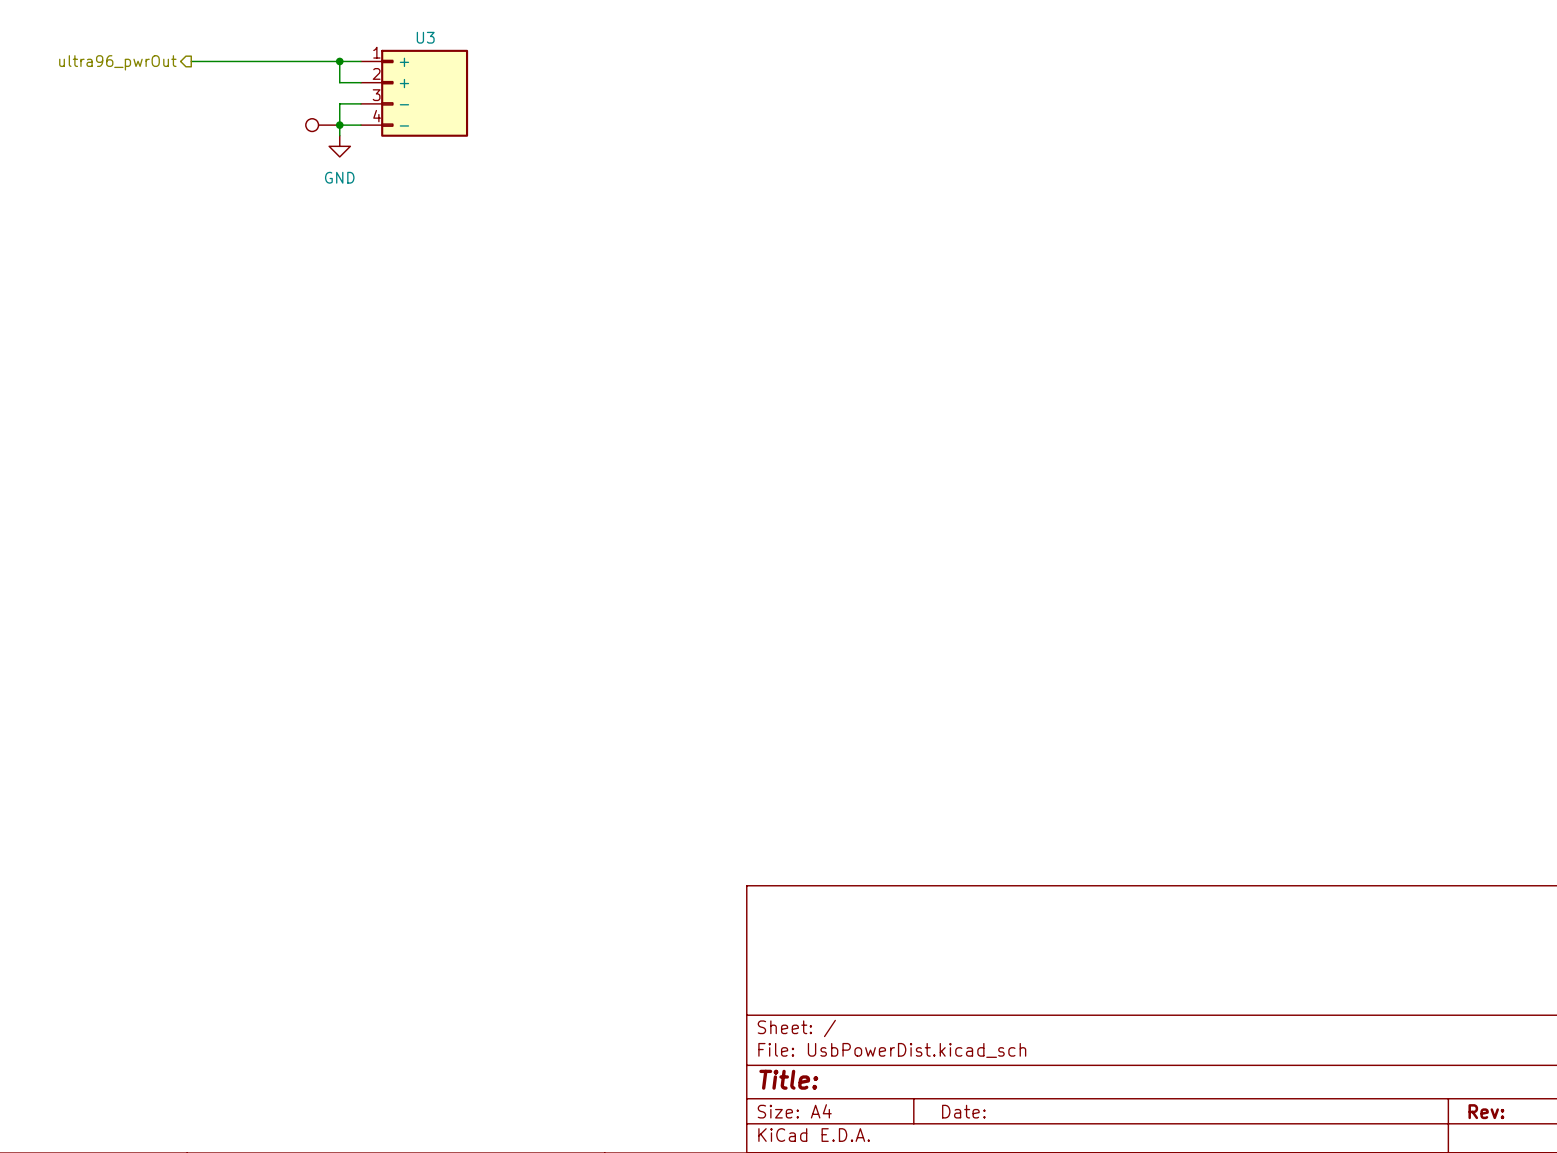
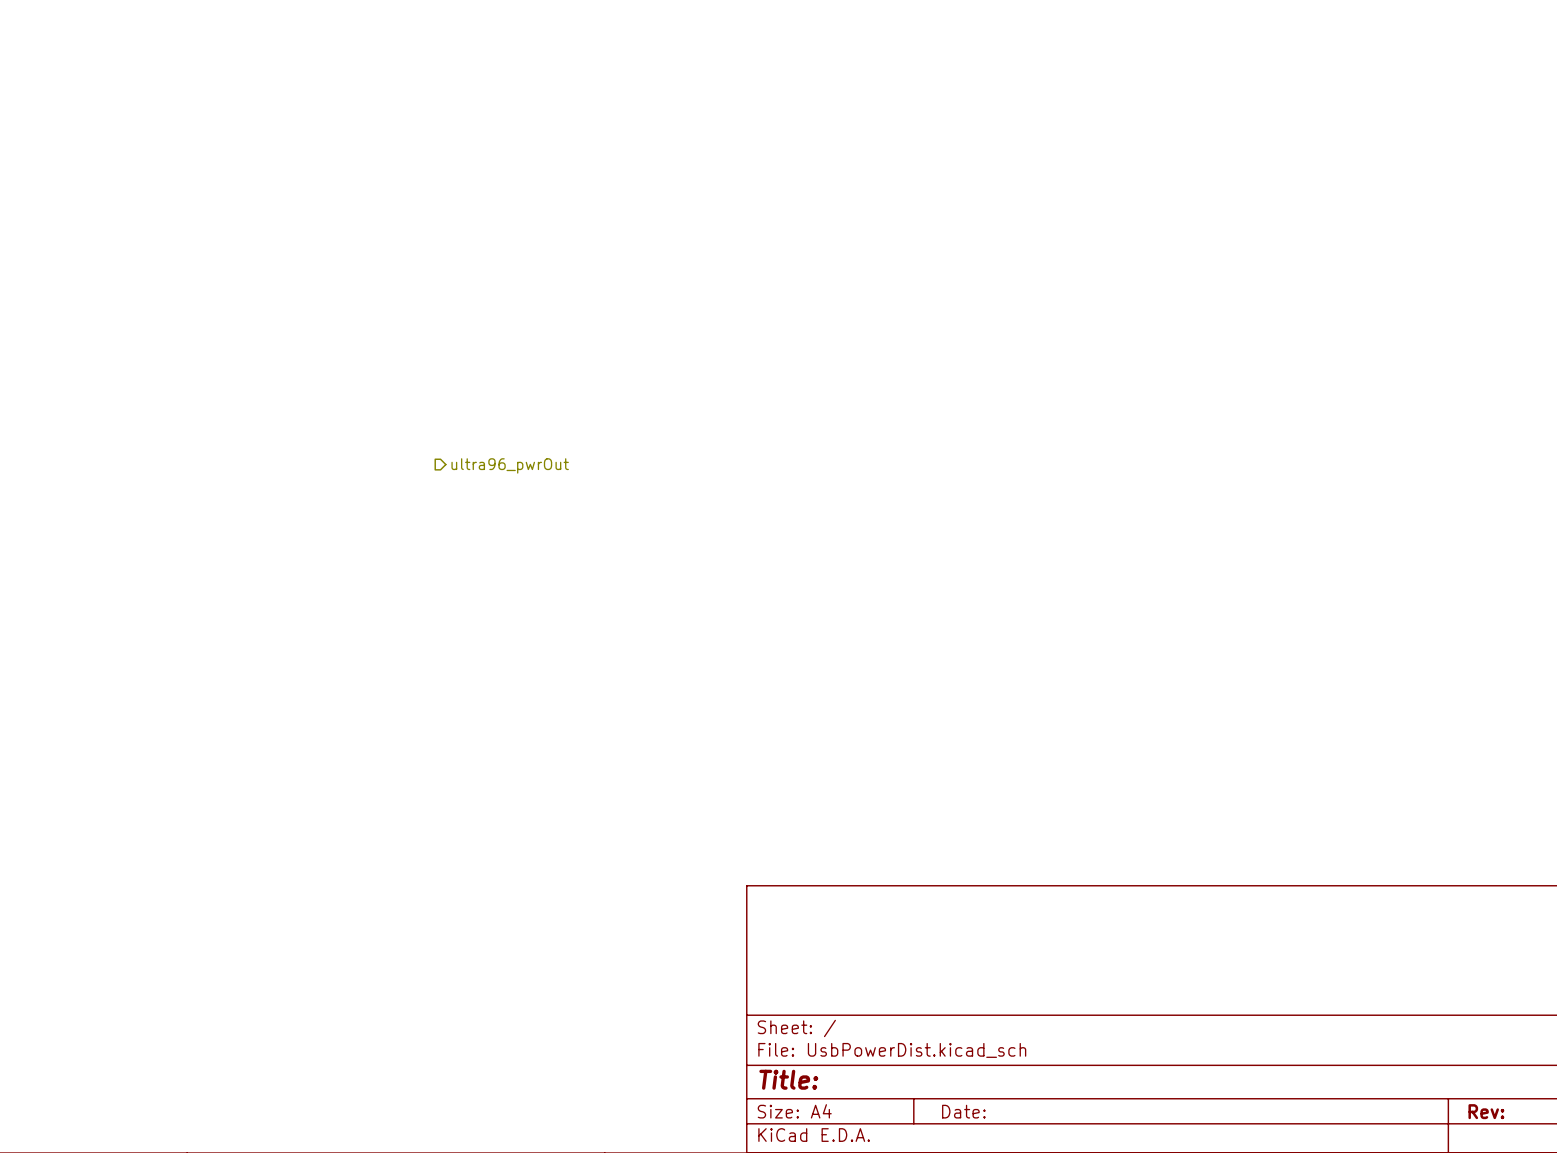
wire: (191, 61) (360, 61) -> none
wire: (339, 61) (339, 82) (360, 82) -> none
junction: (339, 61) -> none
hierarchical label: ultra96_pwrOut (117, 62) -> none
U3: (414, 93) -> none
wire: (360, 103) (339, 103) (339, 135) -> none
part: (322, 125) -> none
wire: (339, 125) (360, 125) -> none
junction: (339, 125) -> none
power symbol: GND (339, 146) -> none
hierarchical label: none -> ultra96_pwrOut (510, 465)

